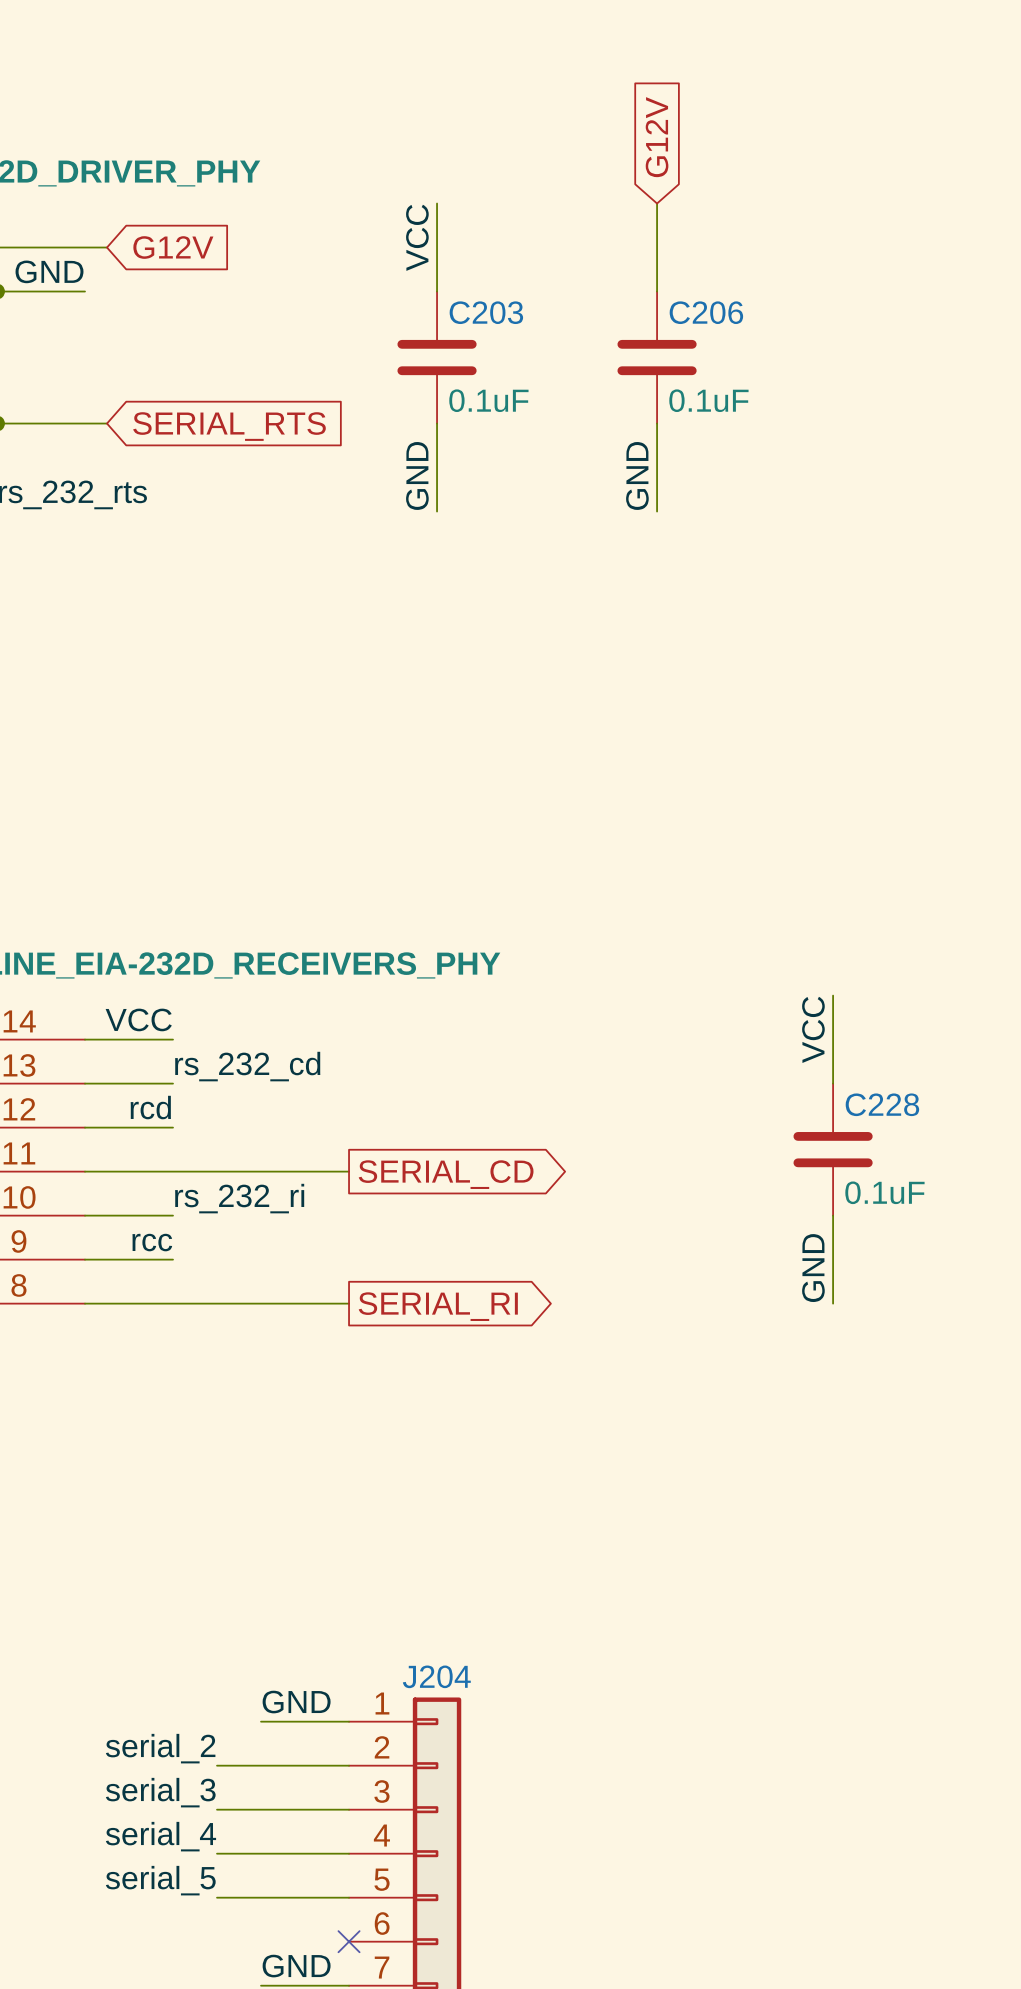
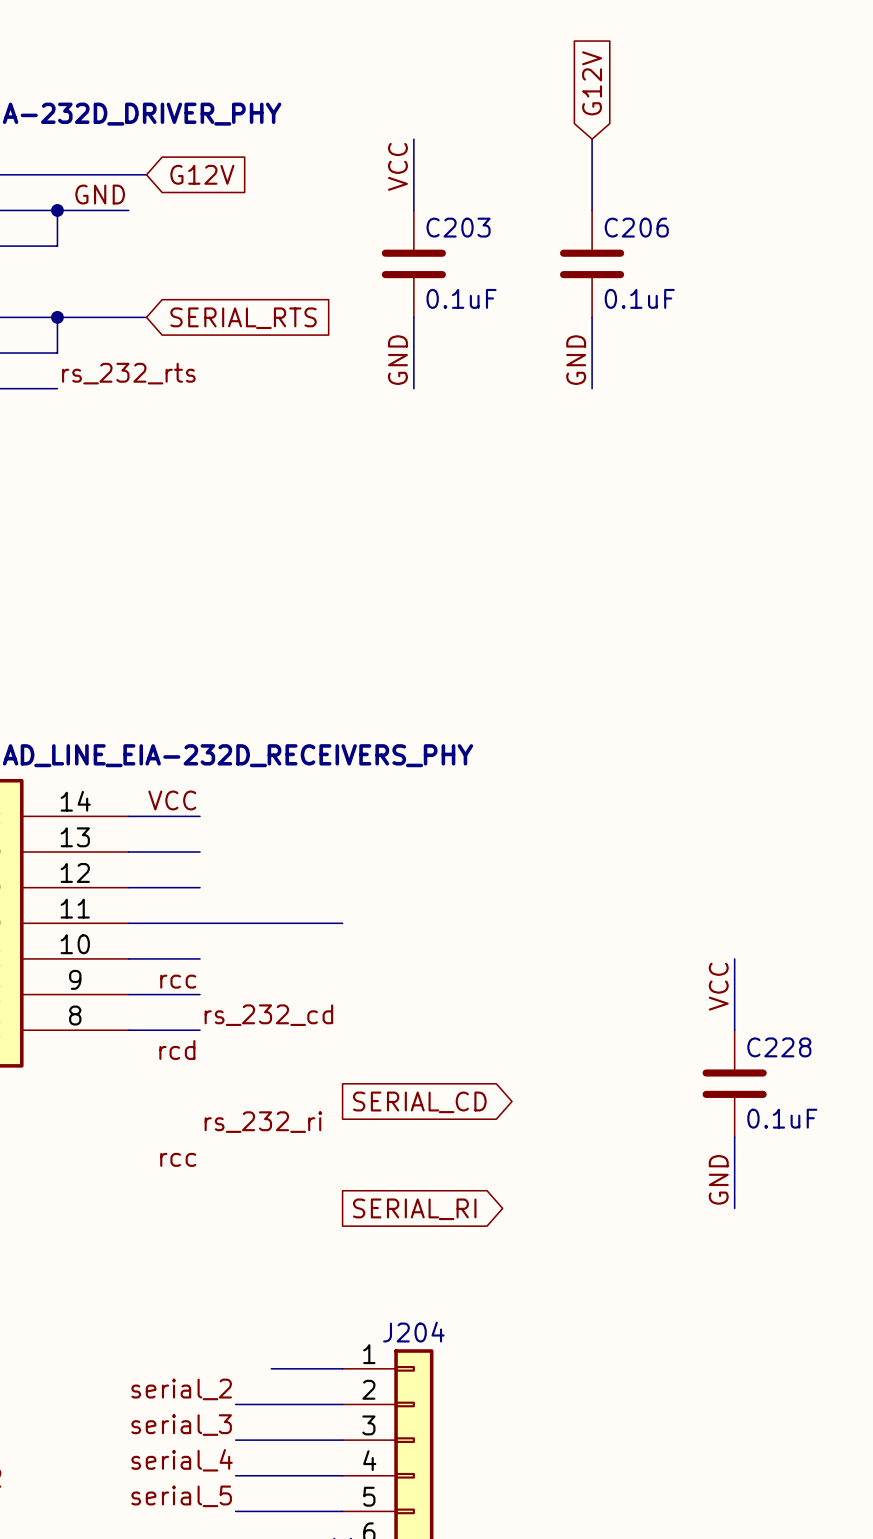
wire: (833, 995) (833, 1083) -> none
label position: VCC (813, 1029) -> VCC (718, 986)
label position: rs_232_cd (247, 1066) -> rs_232_cd (268, 1015)
label position: rcd (150, 1107) -> rcd (177, 1049)
C228 position: (833, 1149) -> (734, 1083)
global label position: SERIAL_CD (446, 1174) -> SERIAL_CD (419, 1102)
label position: rs_232_ri (239, 1198) -> rs_232_ri (263, 1122)
label position: GND (813, 1268) -> GND (718, 1179)
wire: (173, 1303) (349, 1303) -> none
global label position: SERIAL_RI (438, 1306) -> SERIAL_RI (414, 1209)
wire: none -> (734, 1137) (734, 1208)
label: none -> rcc (178, 1159)
label: GND (296, 1702) -> none

